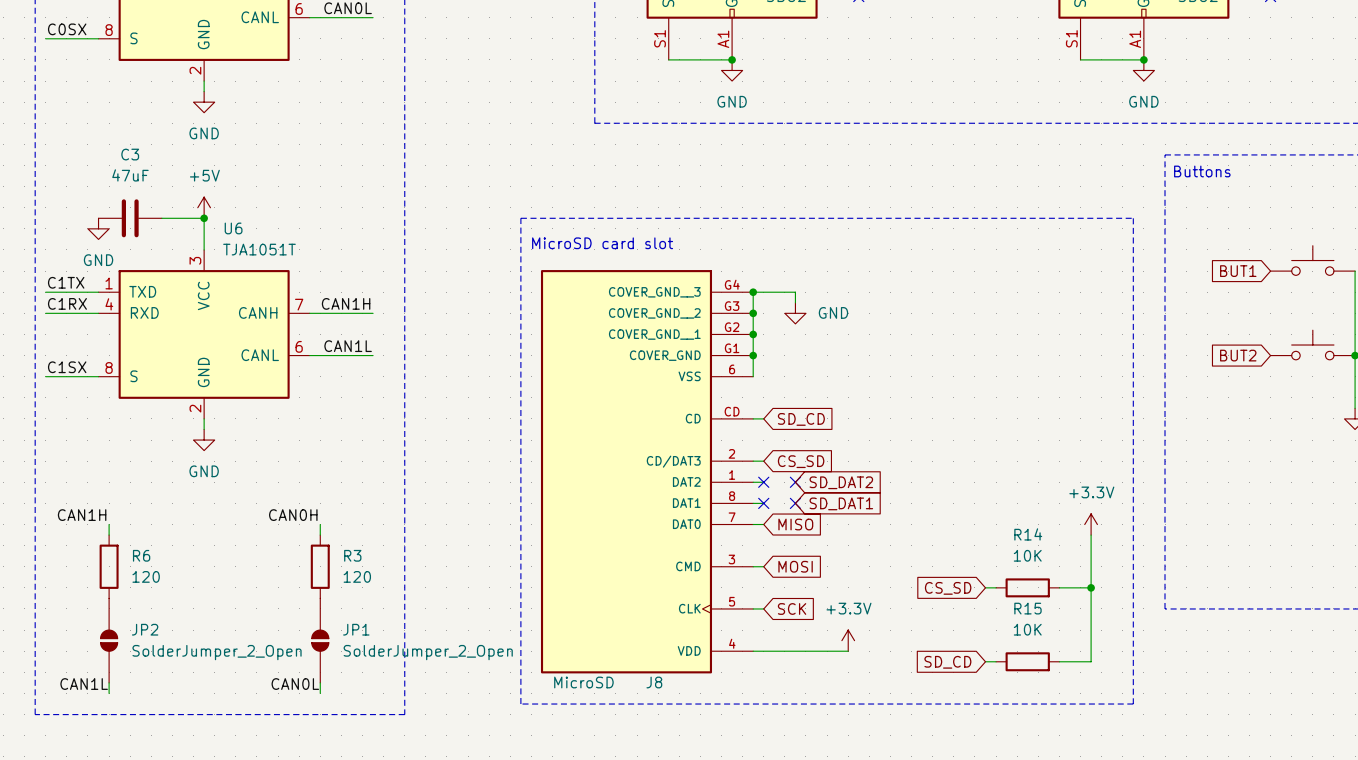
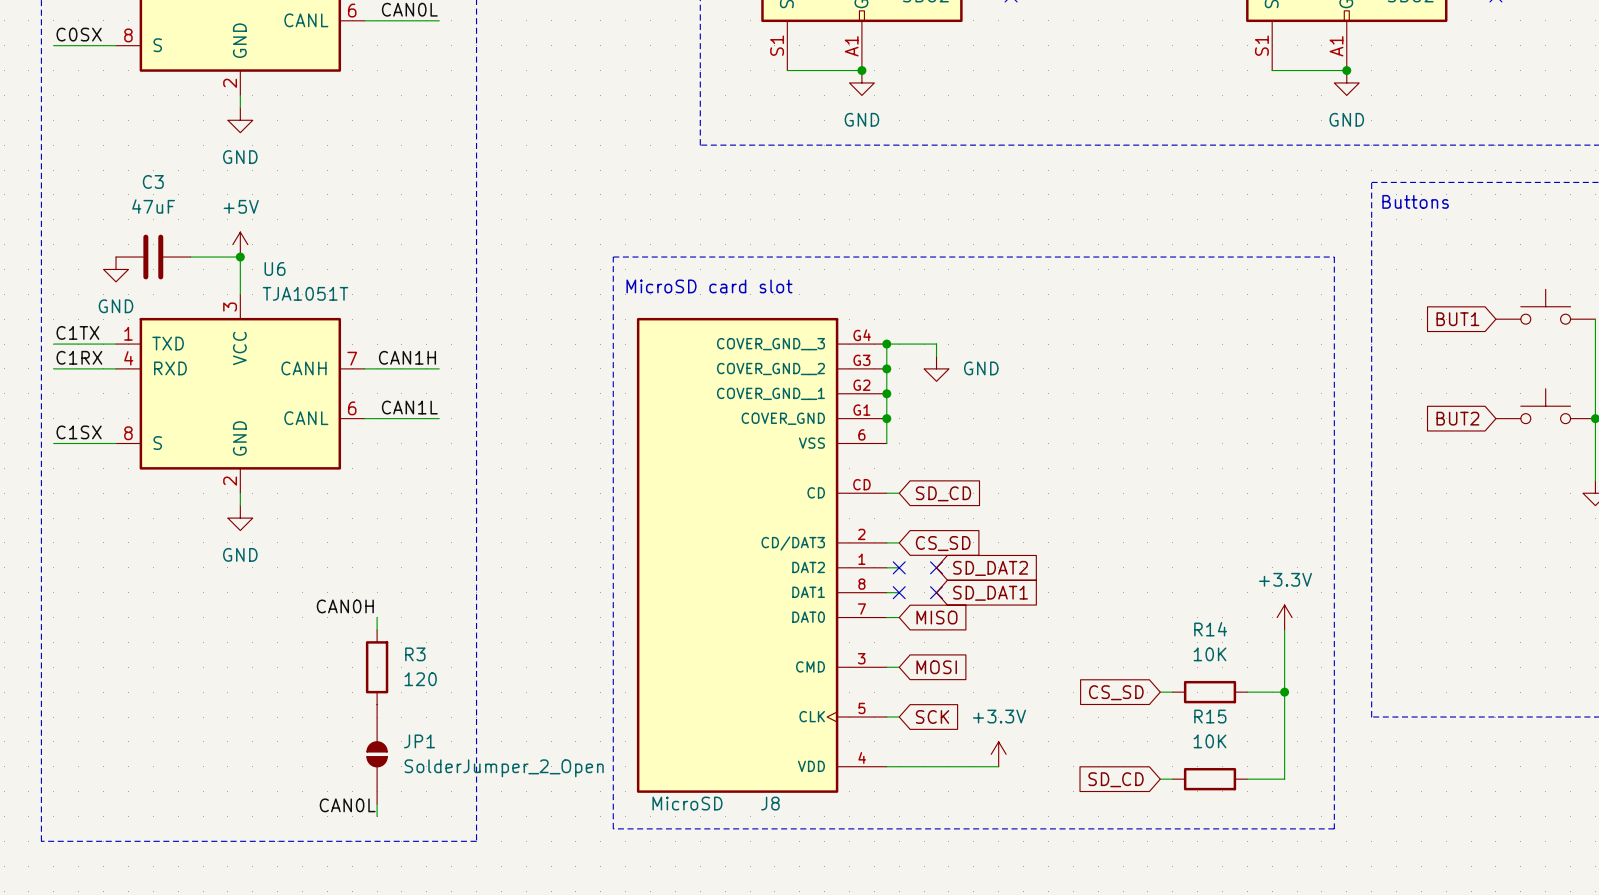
label: CAN1H (82, 515) -> none
wire: (109, 524) (109, 535) -> none
R6: 120 (109, 566) -> none
JP2: SolderJumper_2_Open (109, 640) -> none
wire: (109, 682) (109, 693) -> none
label: CAN1L (84, 684) -> none

